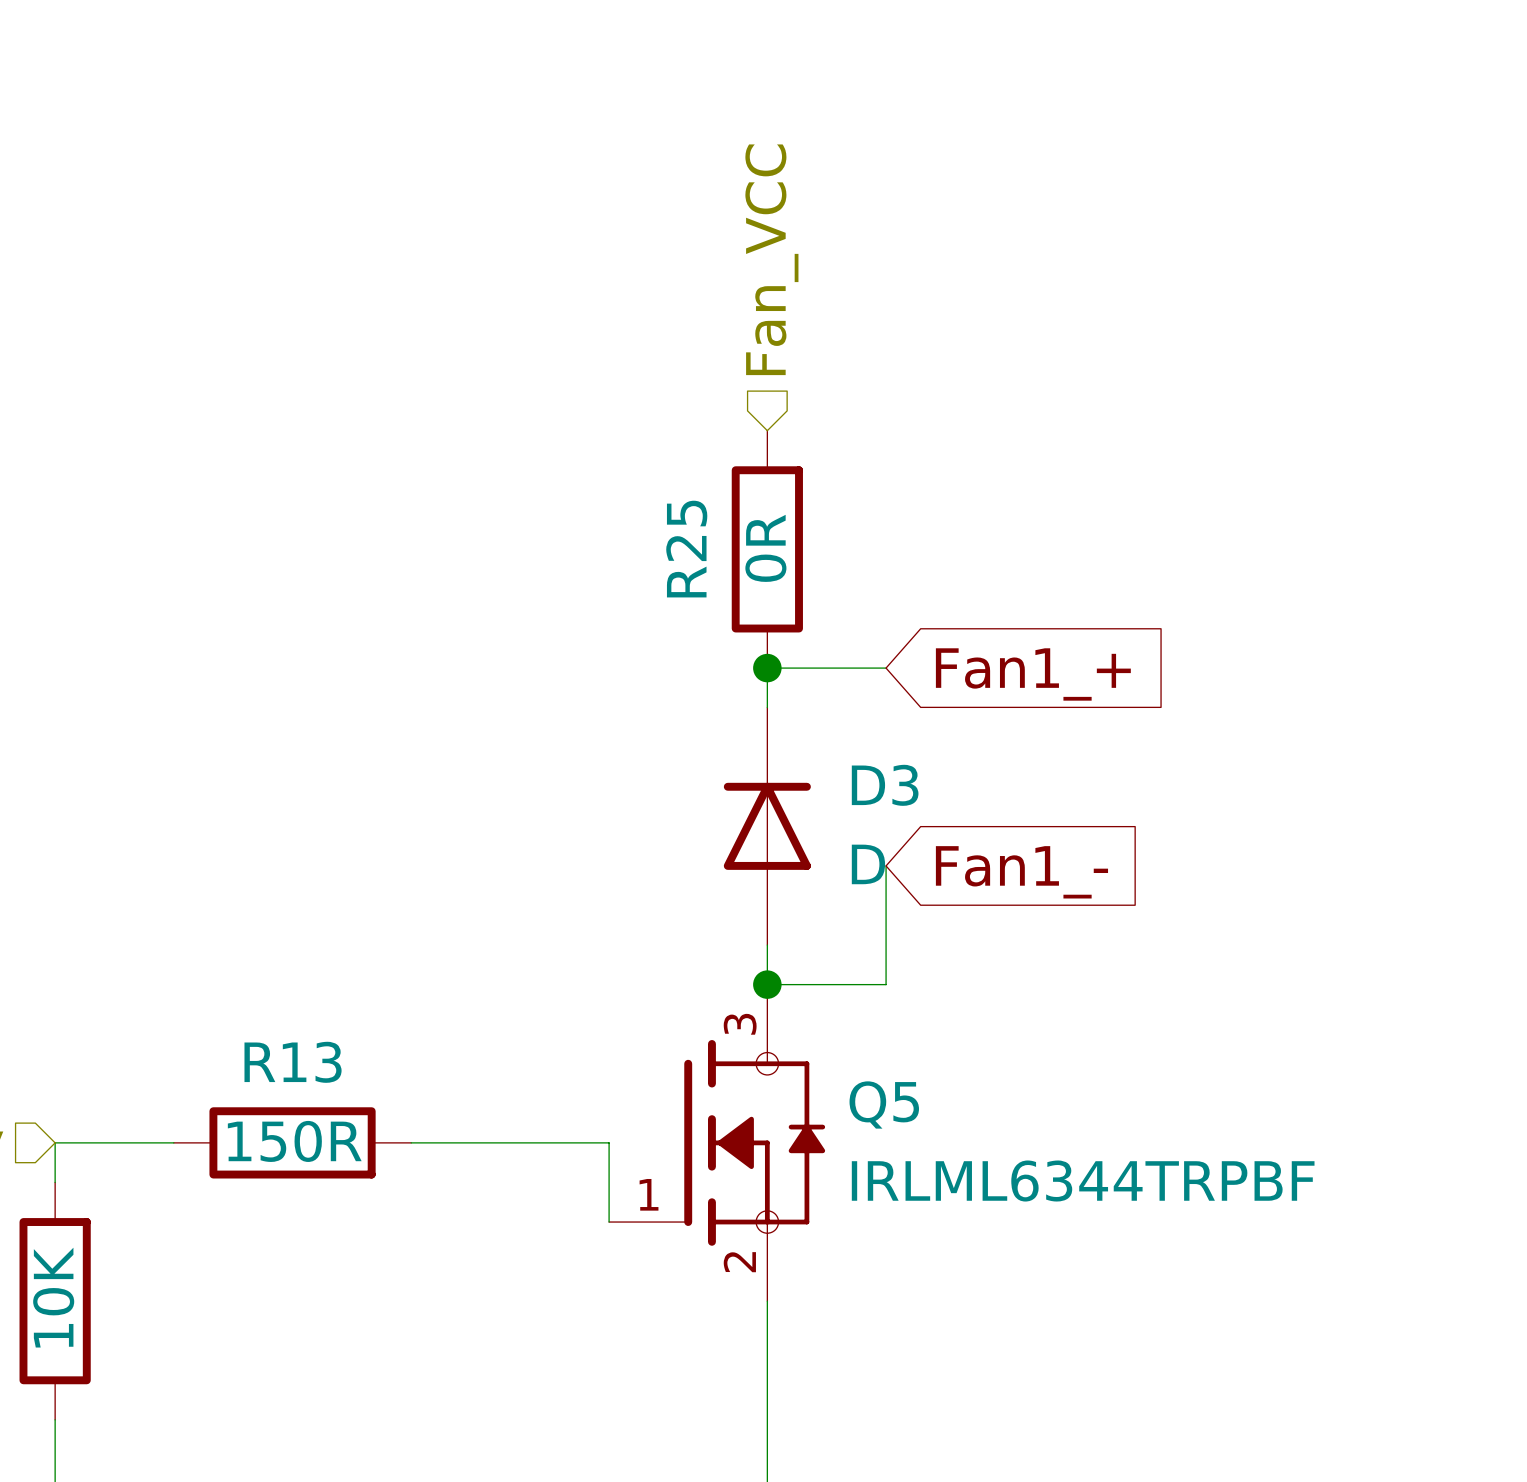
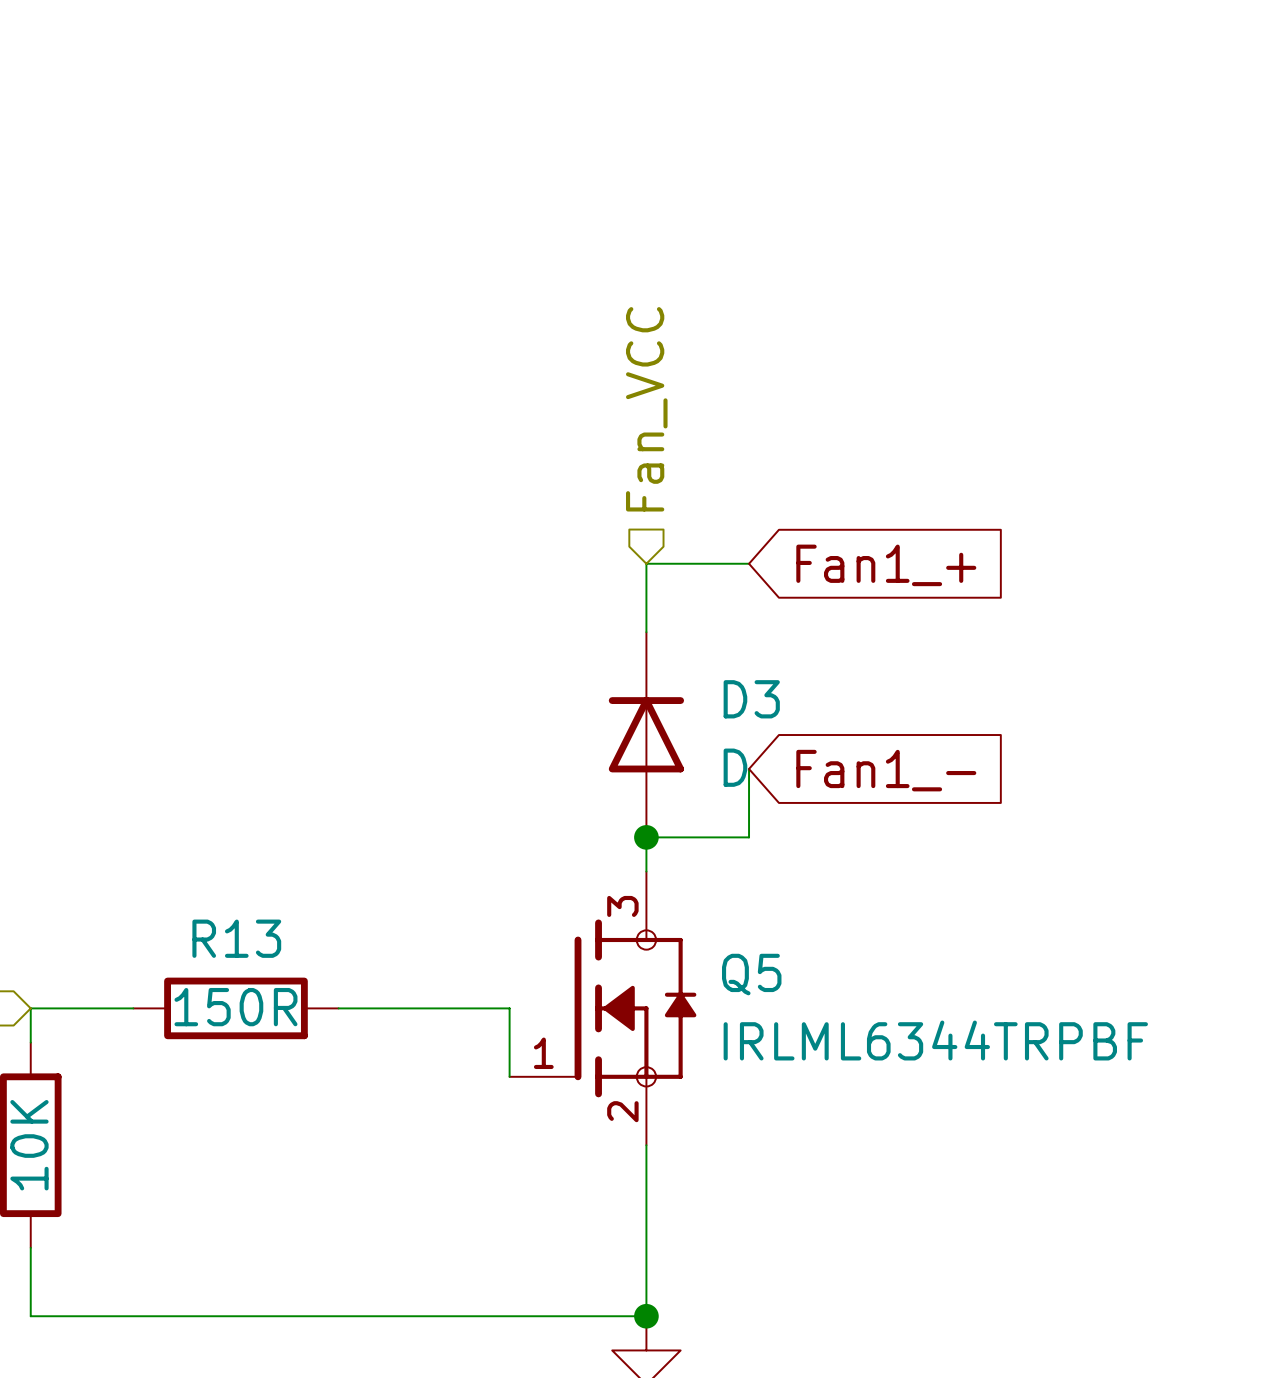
hierarchical label position: Fan_VCC (771, 259) -> Fan_VCC (646, 409)
R25: 0R (767, 549) -> none
wire: (767, 668) (886, 668) -> (646, 597) (646, 563) (749, 563)
junction: (767, 668) -> none
global label position: Fan1_+ (1033, 674) -> Fan1_+ (886, 565)
wire: (886, 945) (886, 984) (767, 984) -> (749, 837) (646, 837)
junction position: (767, 984) -> (646, 837)

